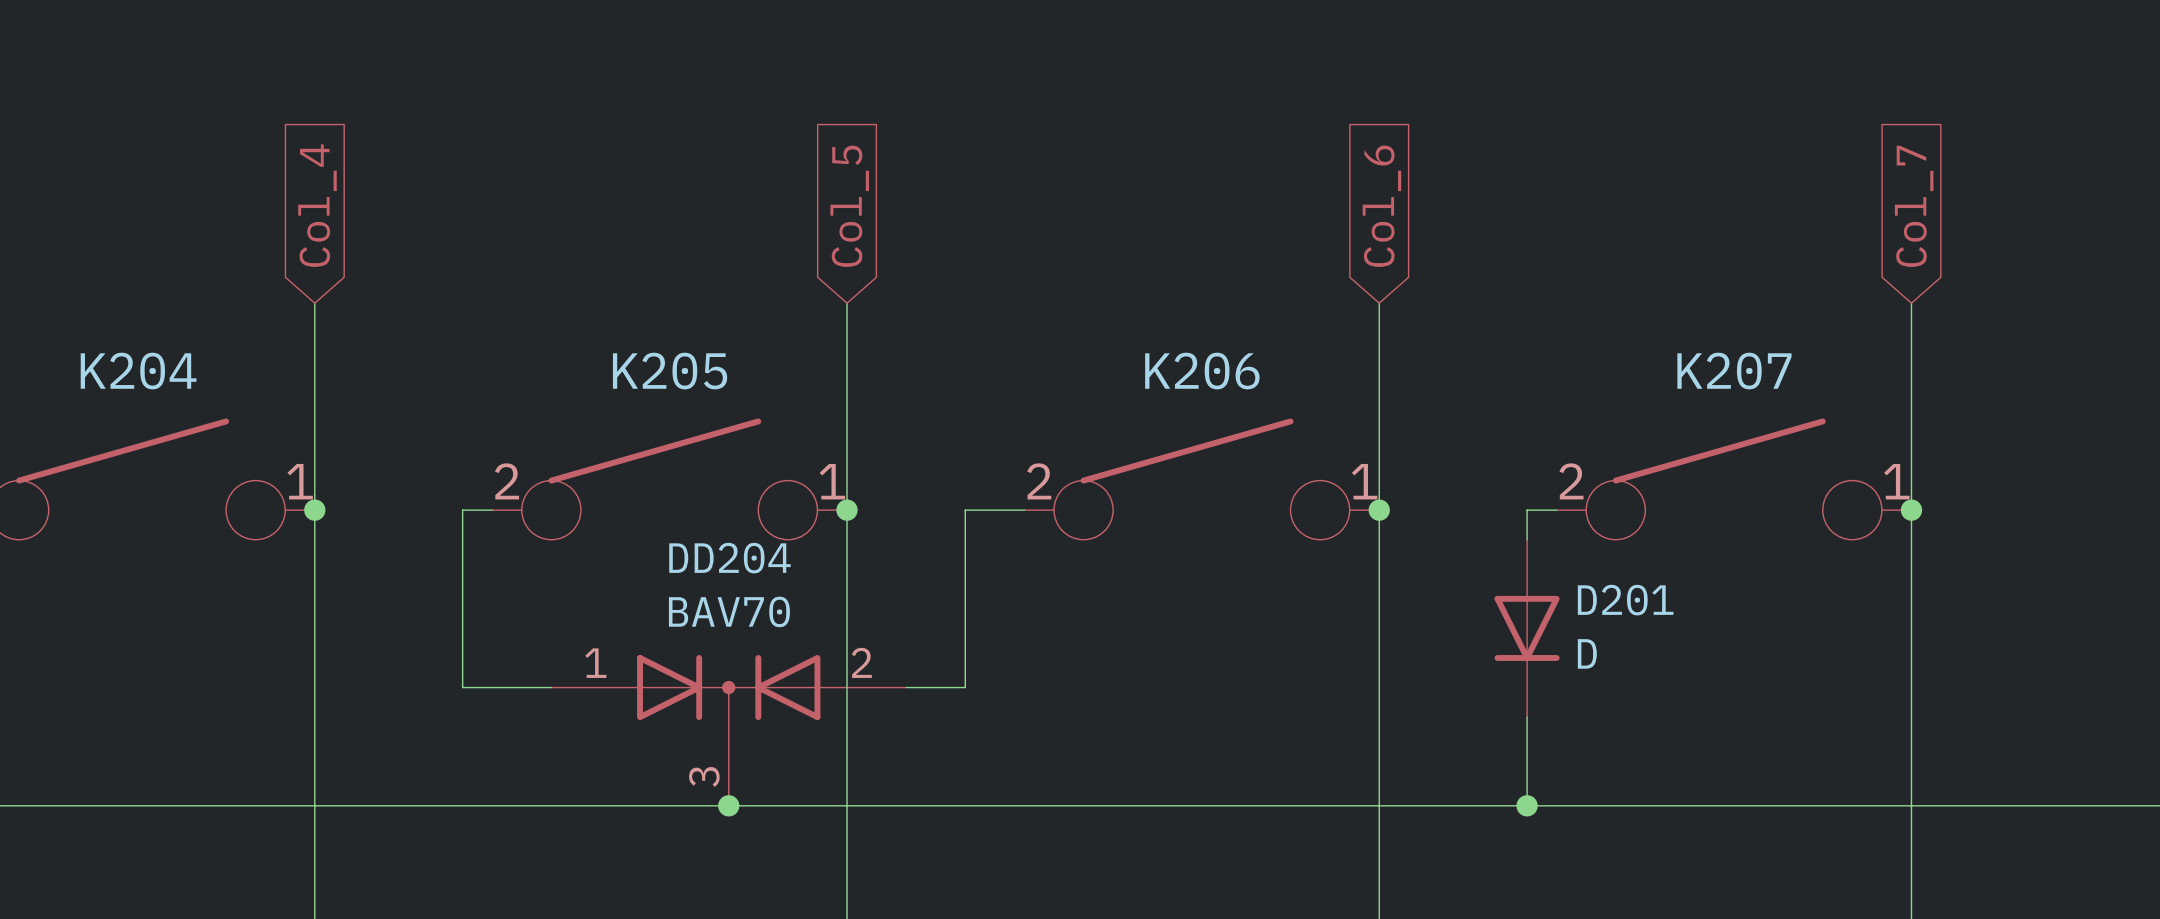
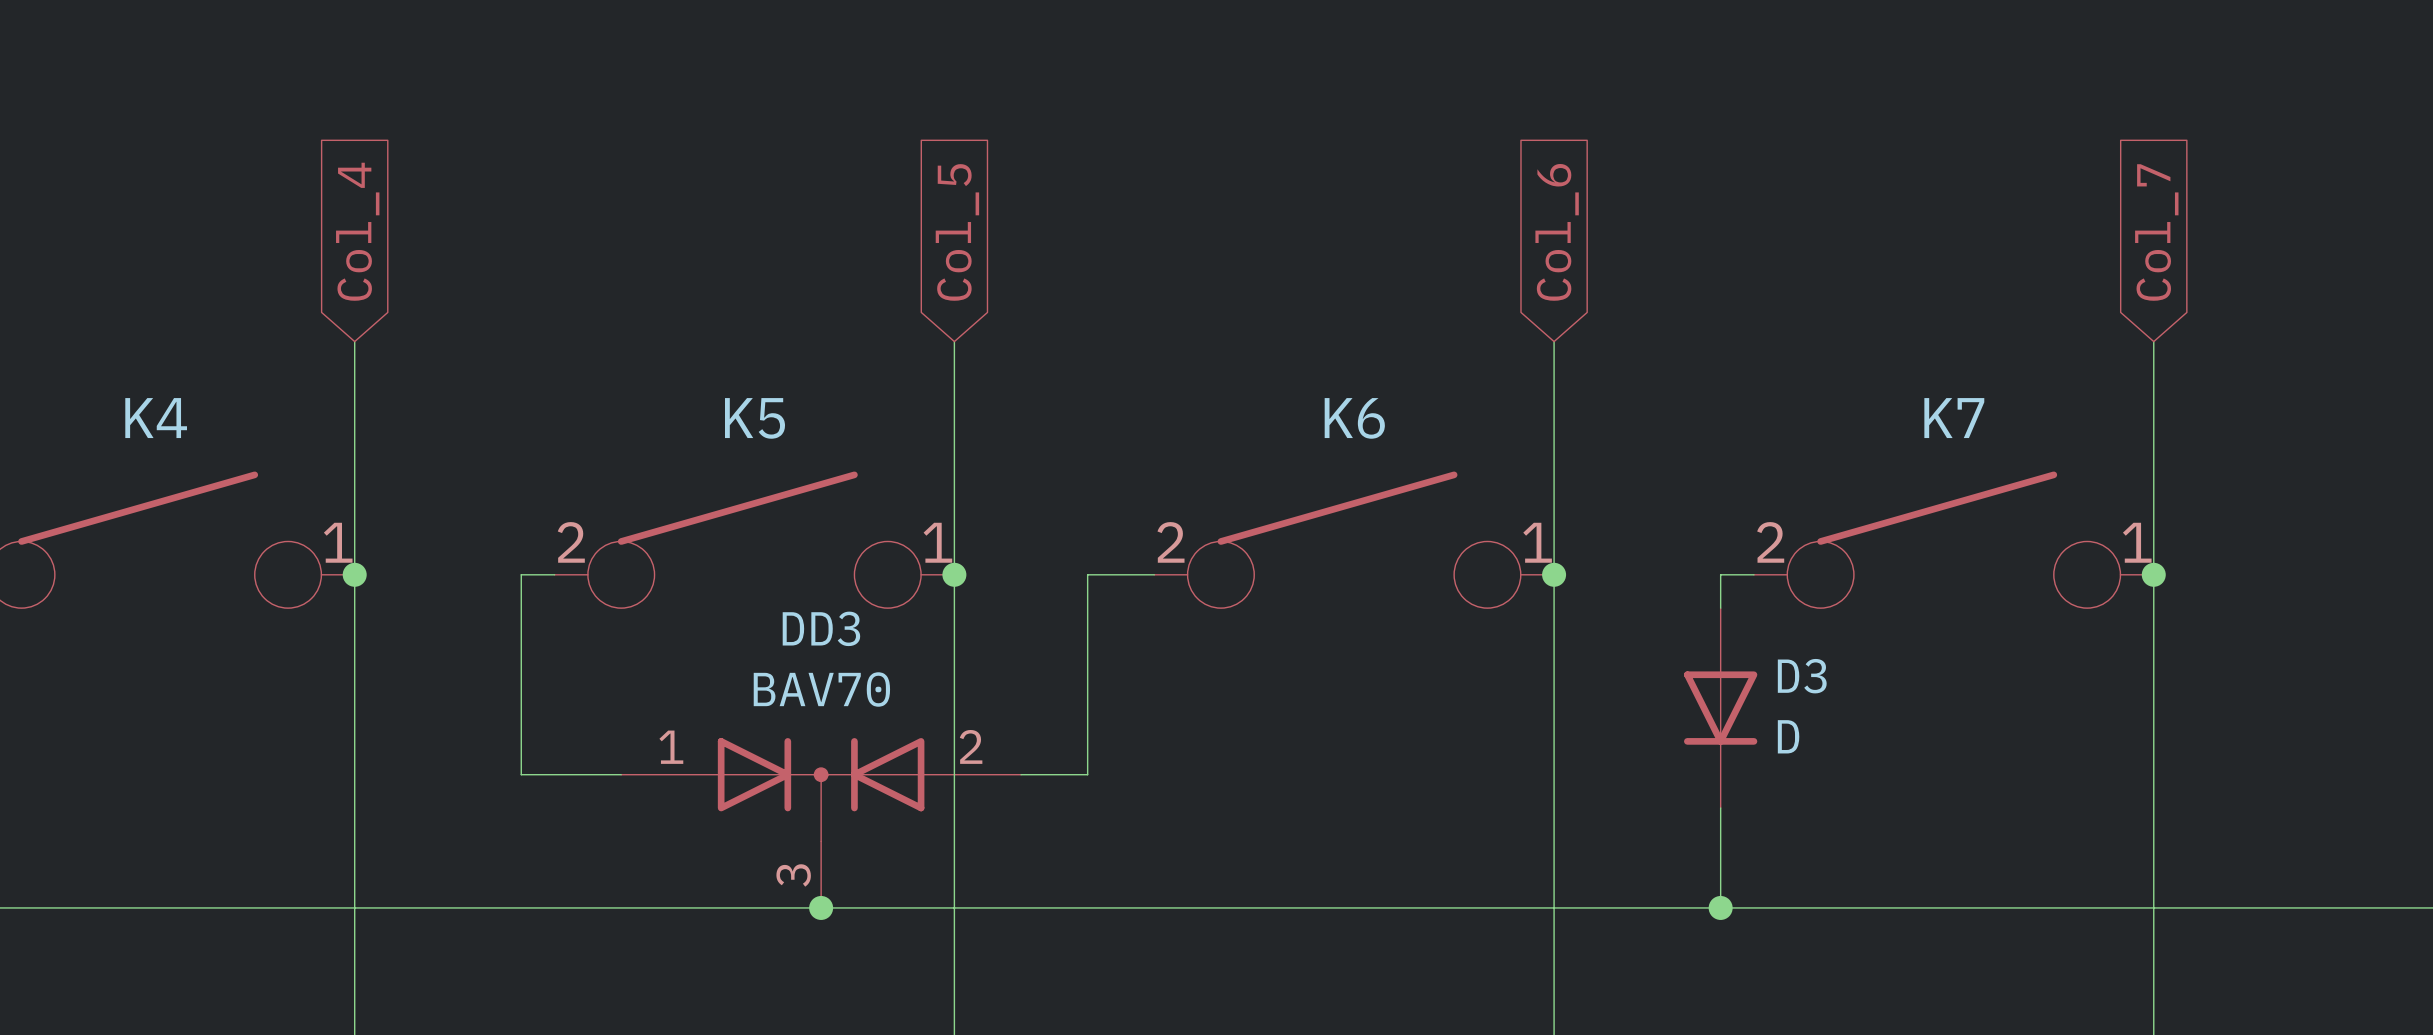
K204 name: K204 (138, 371) -> K4 (156, 418)
K205 name: K205 (670, 371) -> K5 (755, 418)
K206 name: K206 (1202, 371) -> K6 (1354, 418)
K207 name: K207 (1734, 371) -> K7 (1954, 418)
DD204 name: DD204 (729, 558) -> DD3 (821, 628)
D201 name: D201 (1625, 600) -> D3 (1802, 676)

